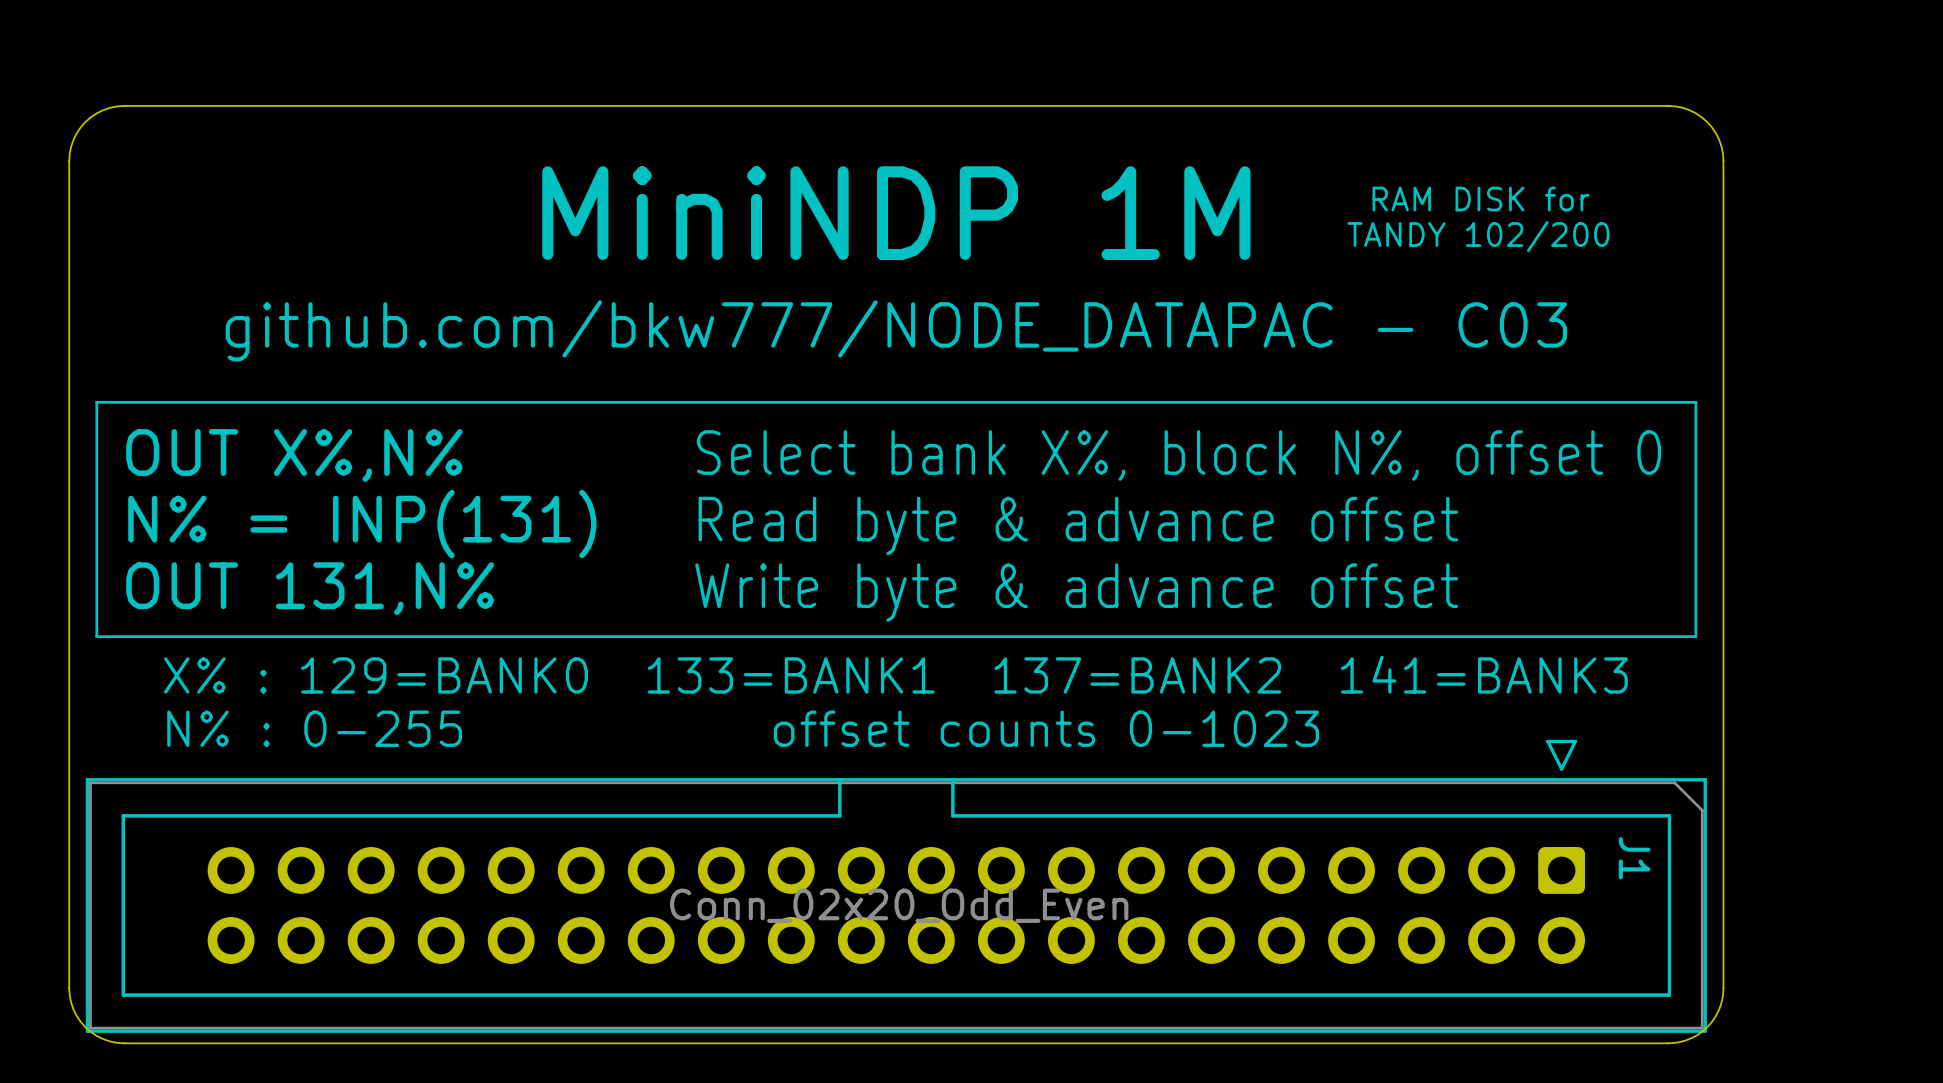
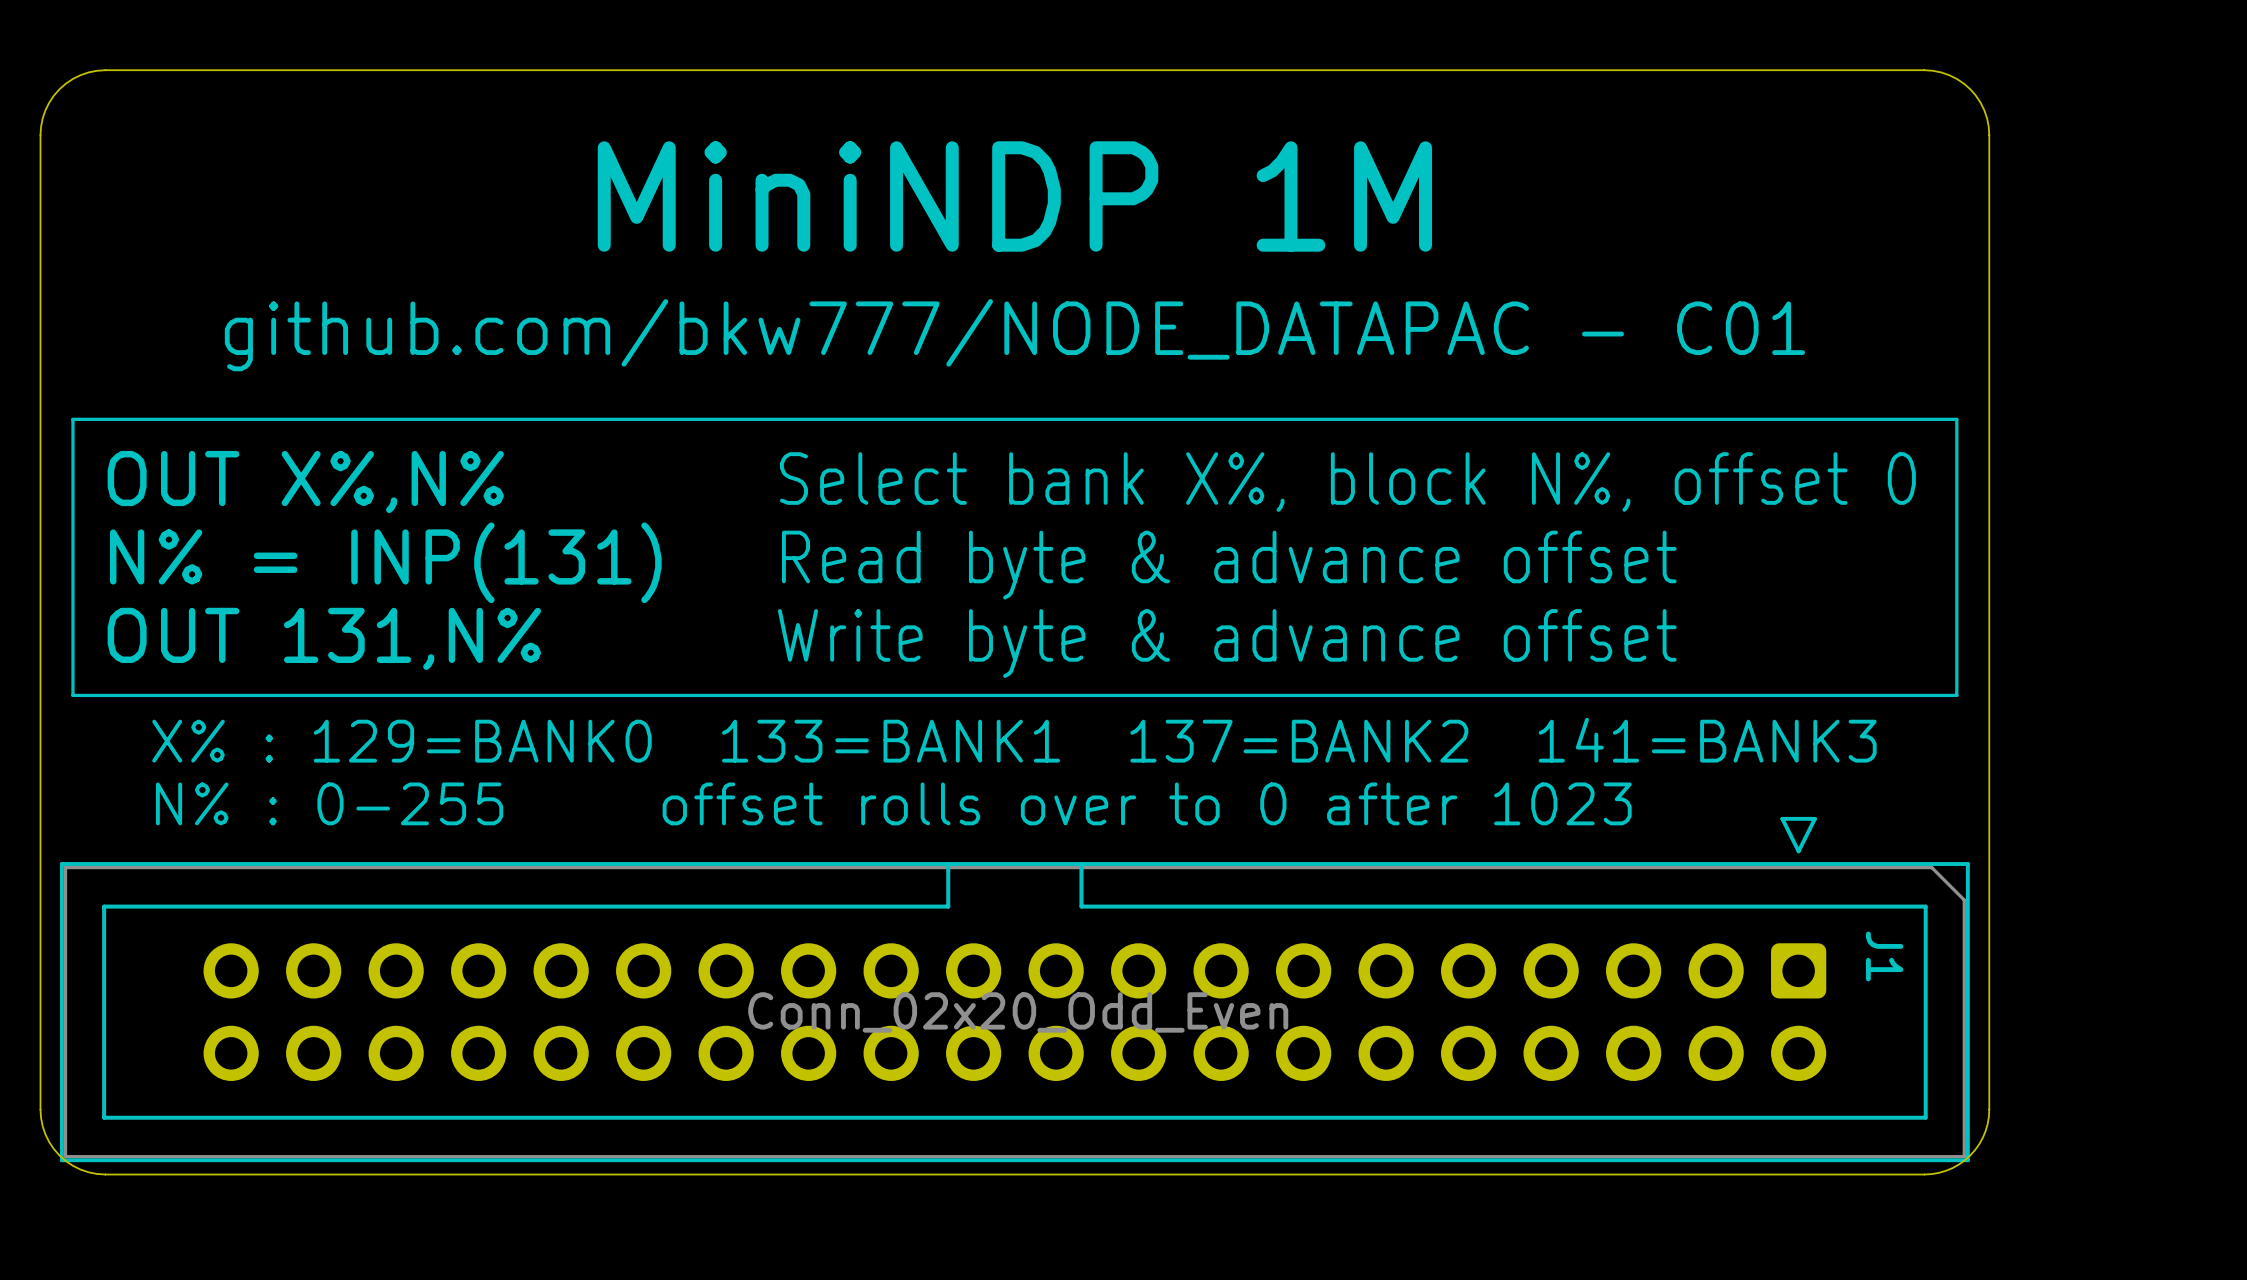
text: RAM DISK for (1481, 199) -> none
text: TANDY 102/200 (1478, 236) -> none
text: github.com/bkw777/NODE_DATAPAC - C03 (896, 330) -> github.com/bkw777/NODE_DATAPAC - C01 (1014, 335)
text: N% : 0-255 offset counts 0-1023 (743, 728) -> N% : 0-255 offset rolls over to 0 after 1023 (893, 803)

